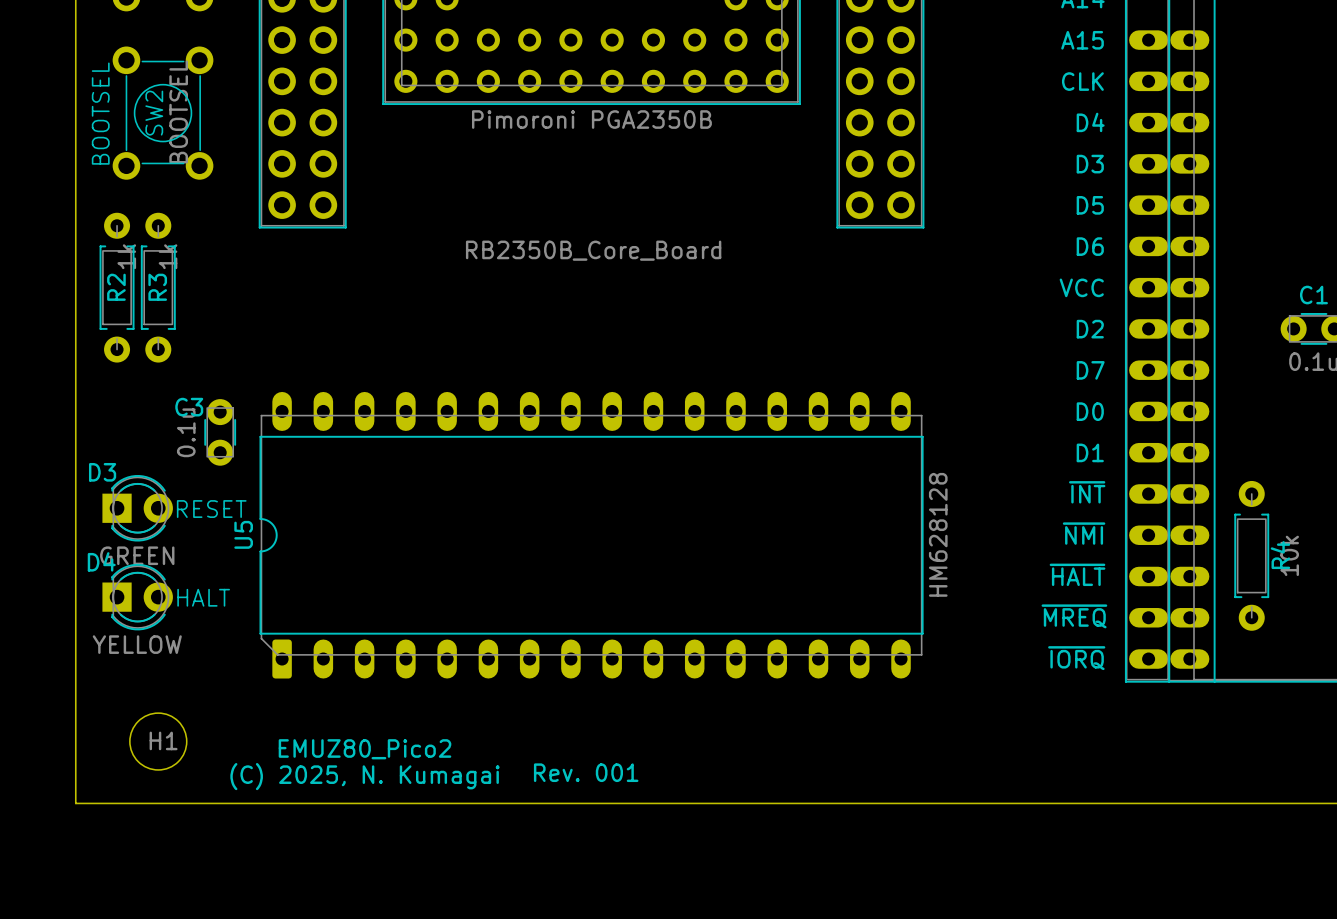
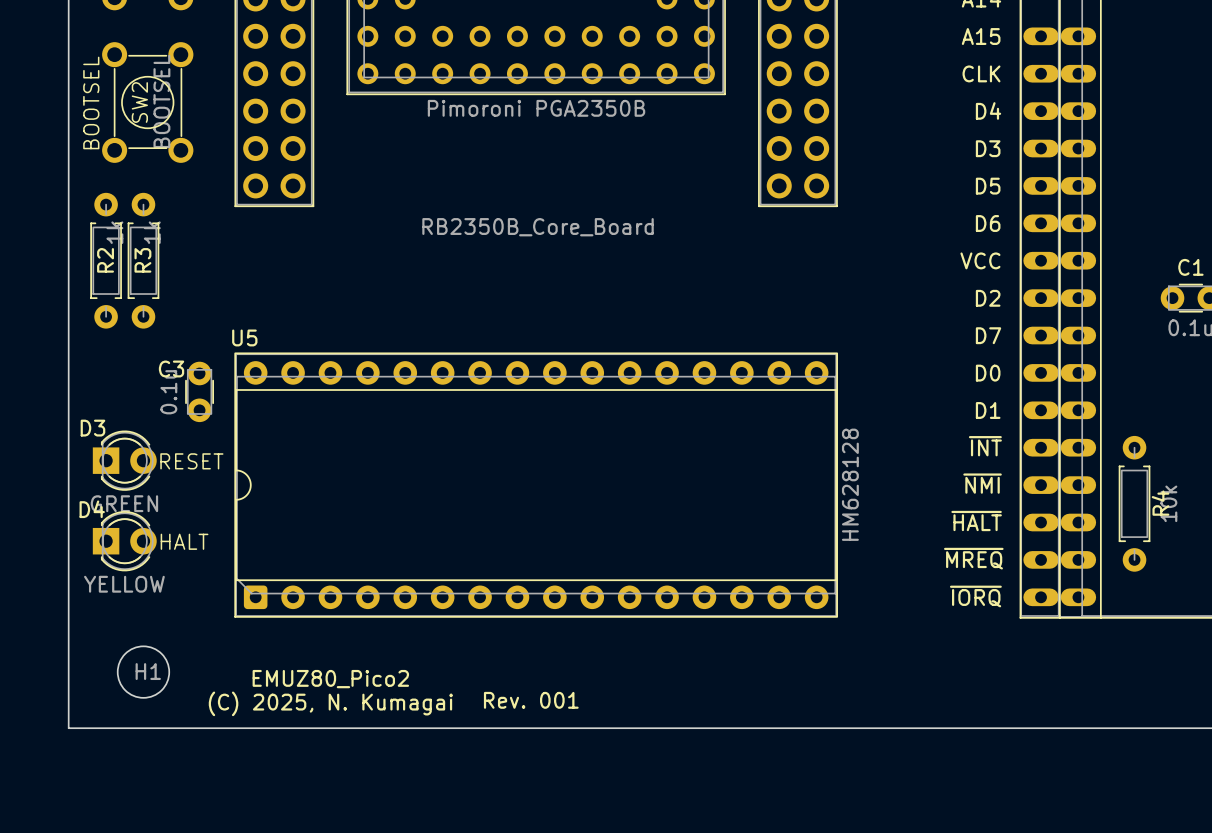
U5 footprint: [259, 391, 924, 679] -> [234, 352, 838, 618]
U5 name position: U5 (243, 534) -> U5 (244, 337)

